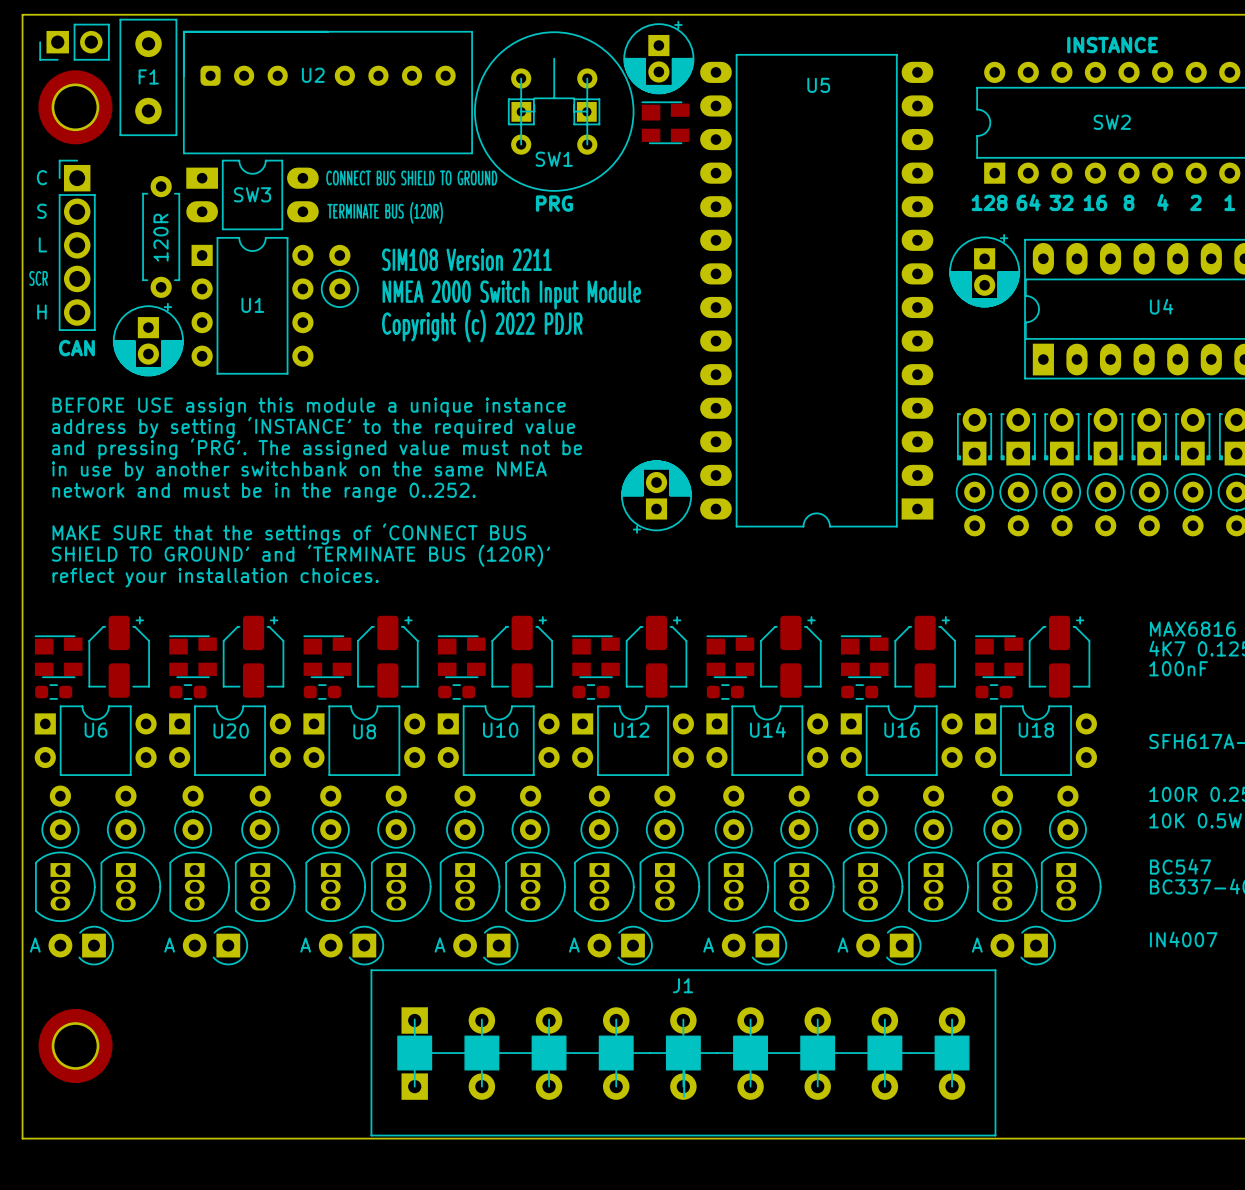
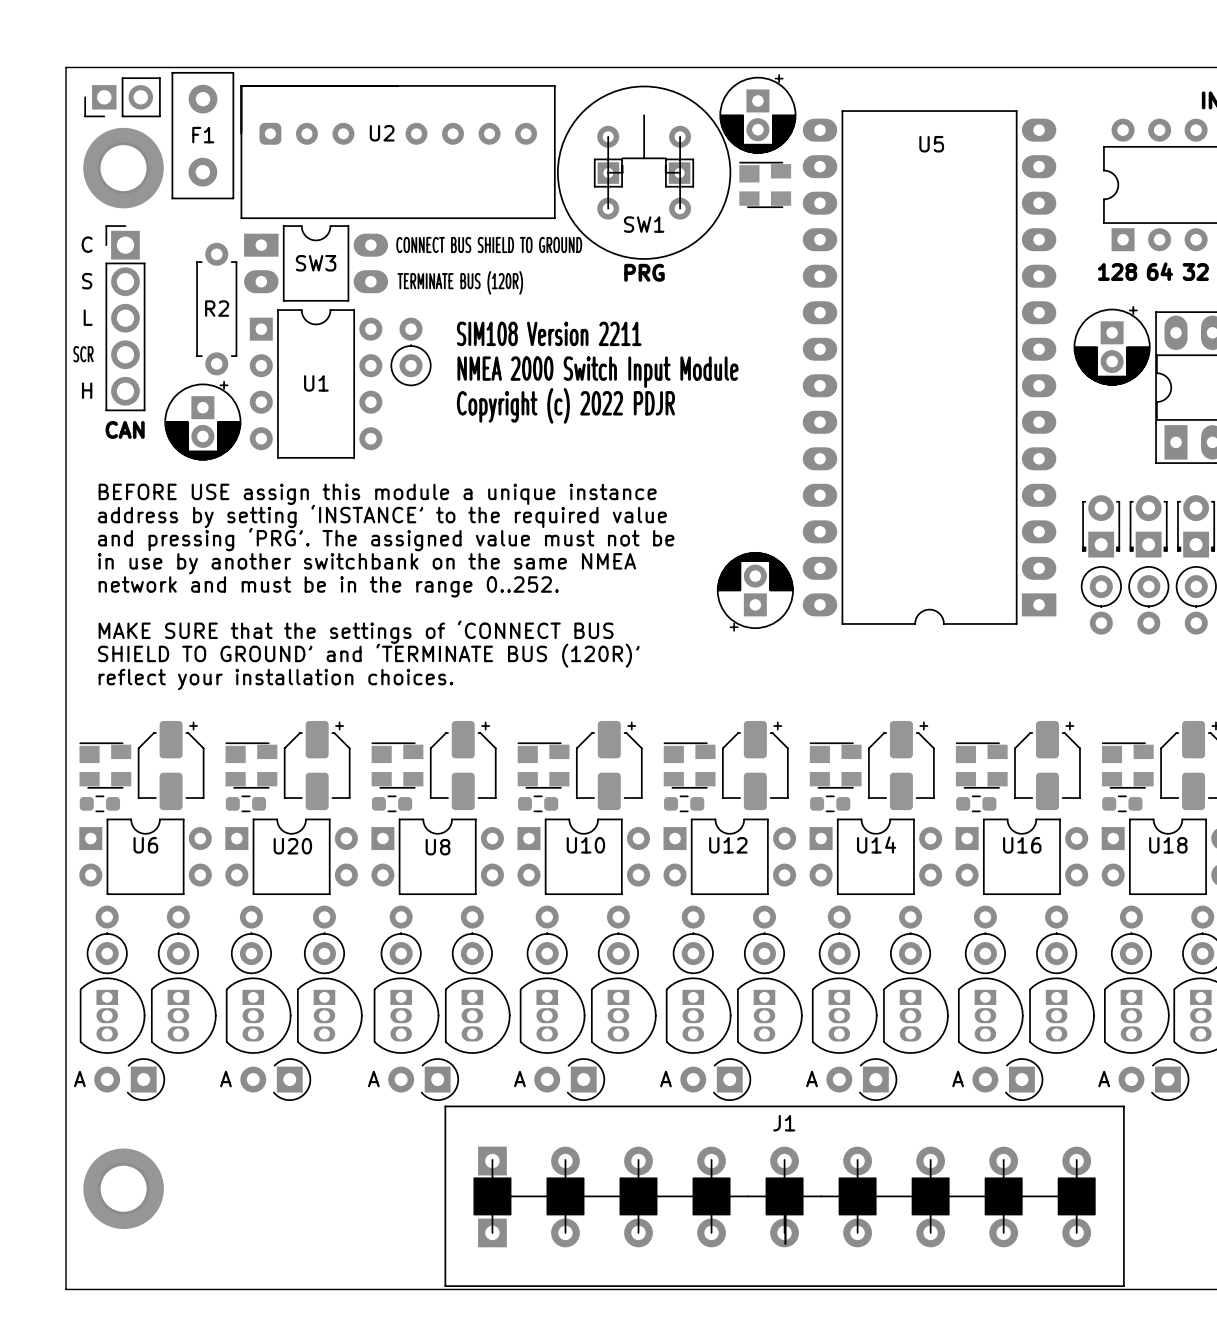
R2 name: none -> R2 (217, 308)
R2 value: 120R (161, 237) -> none

